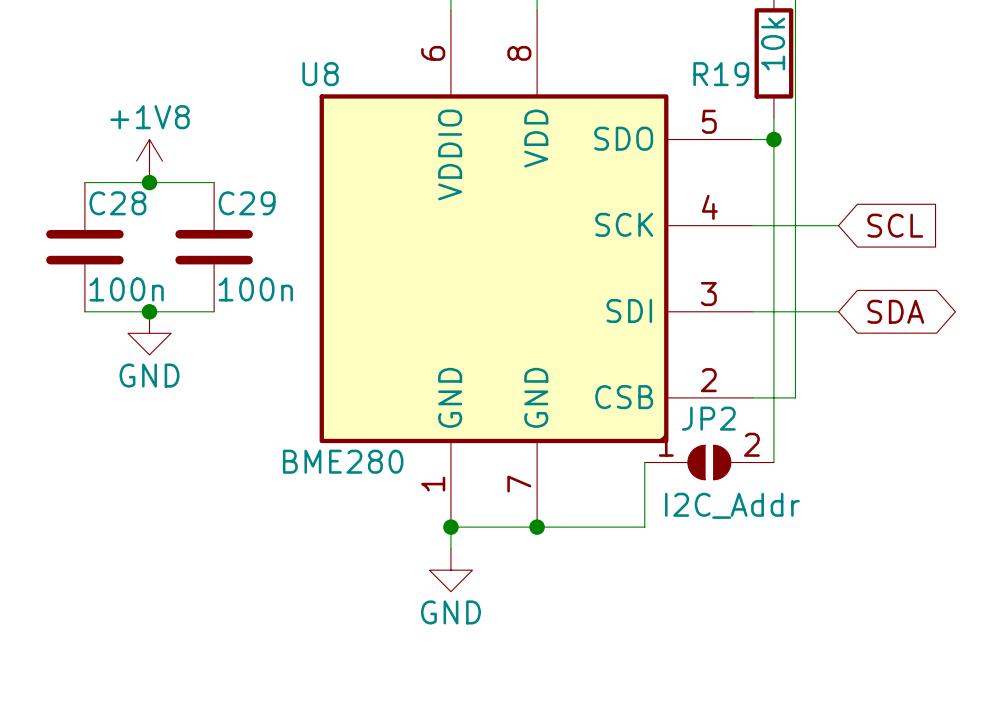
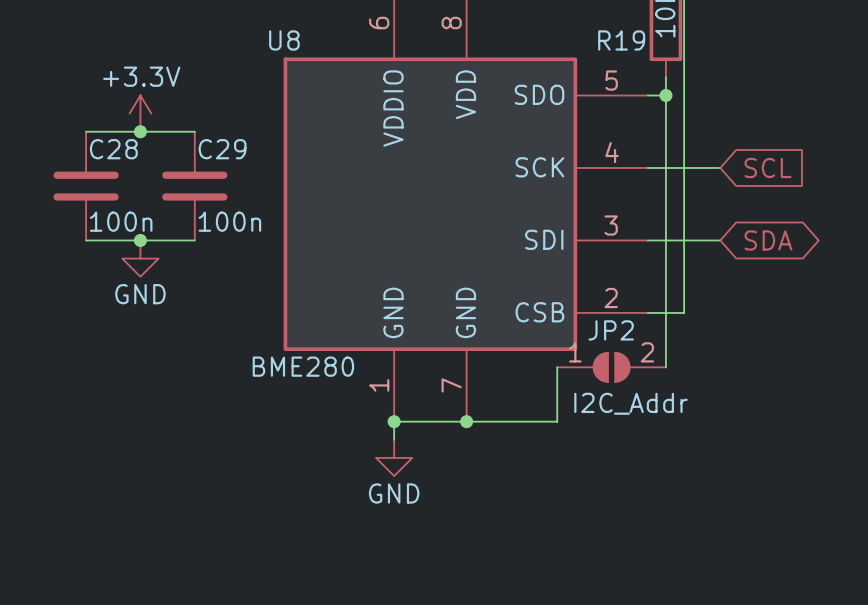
power symbol: +1V8 (149, 161) -> +3.3V (140, 113)

